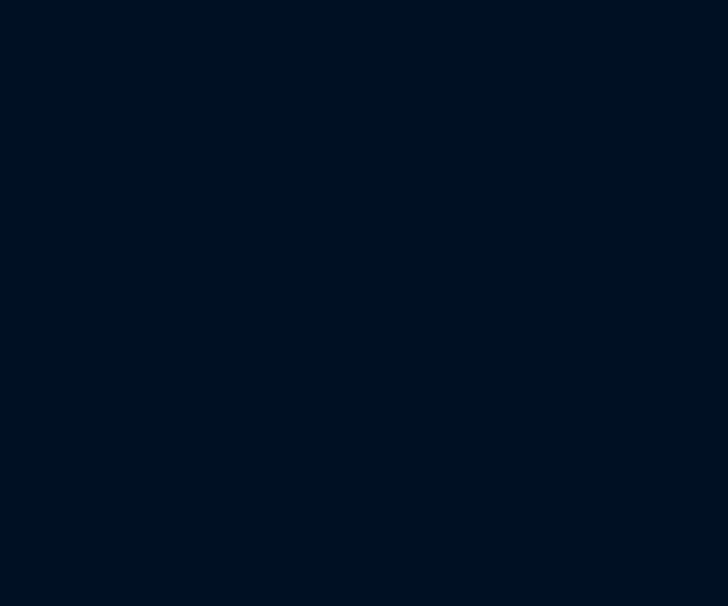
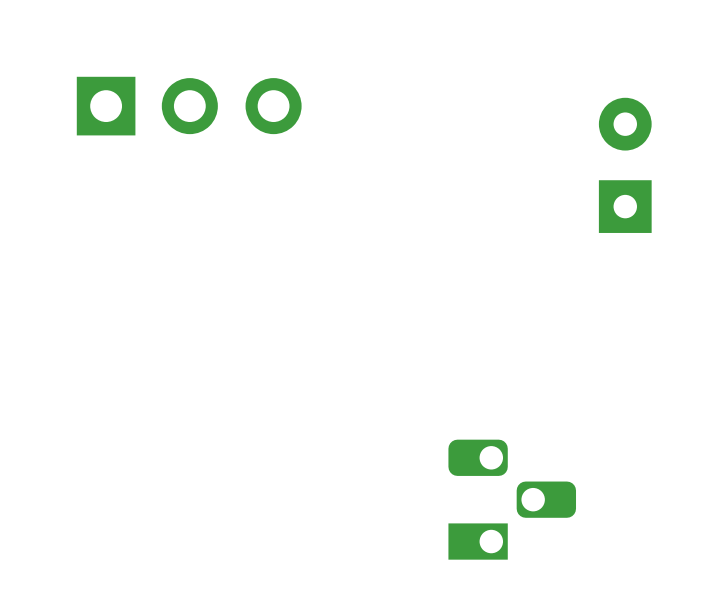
part: none -> (189, 106)
part: none -> (625, 165)
part: none -> (512, 499)

